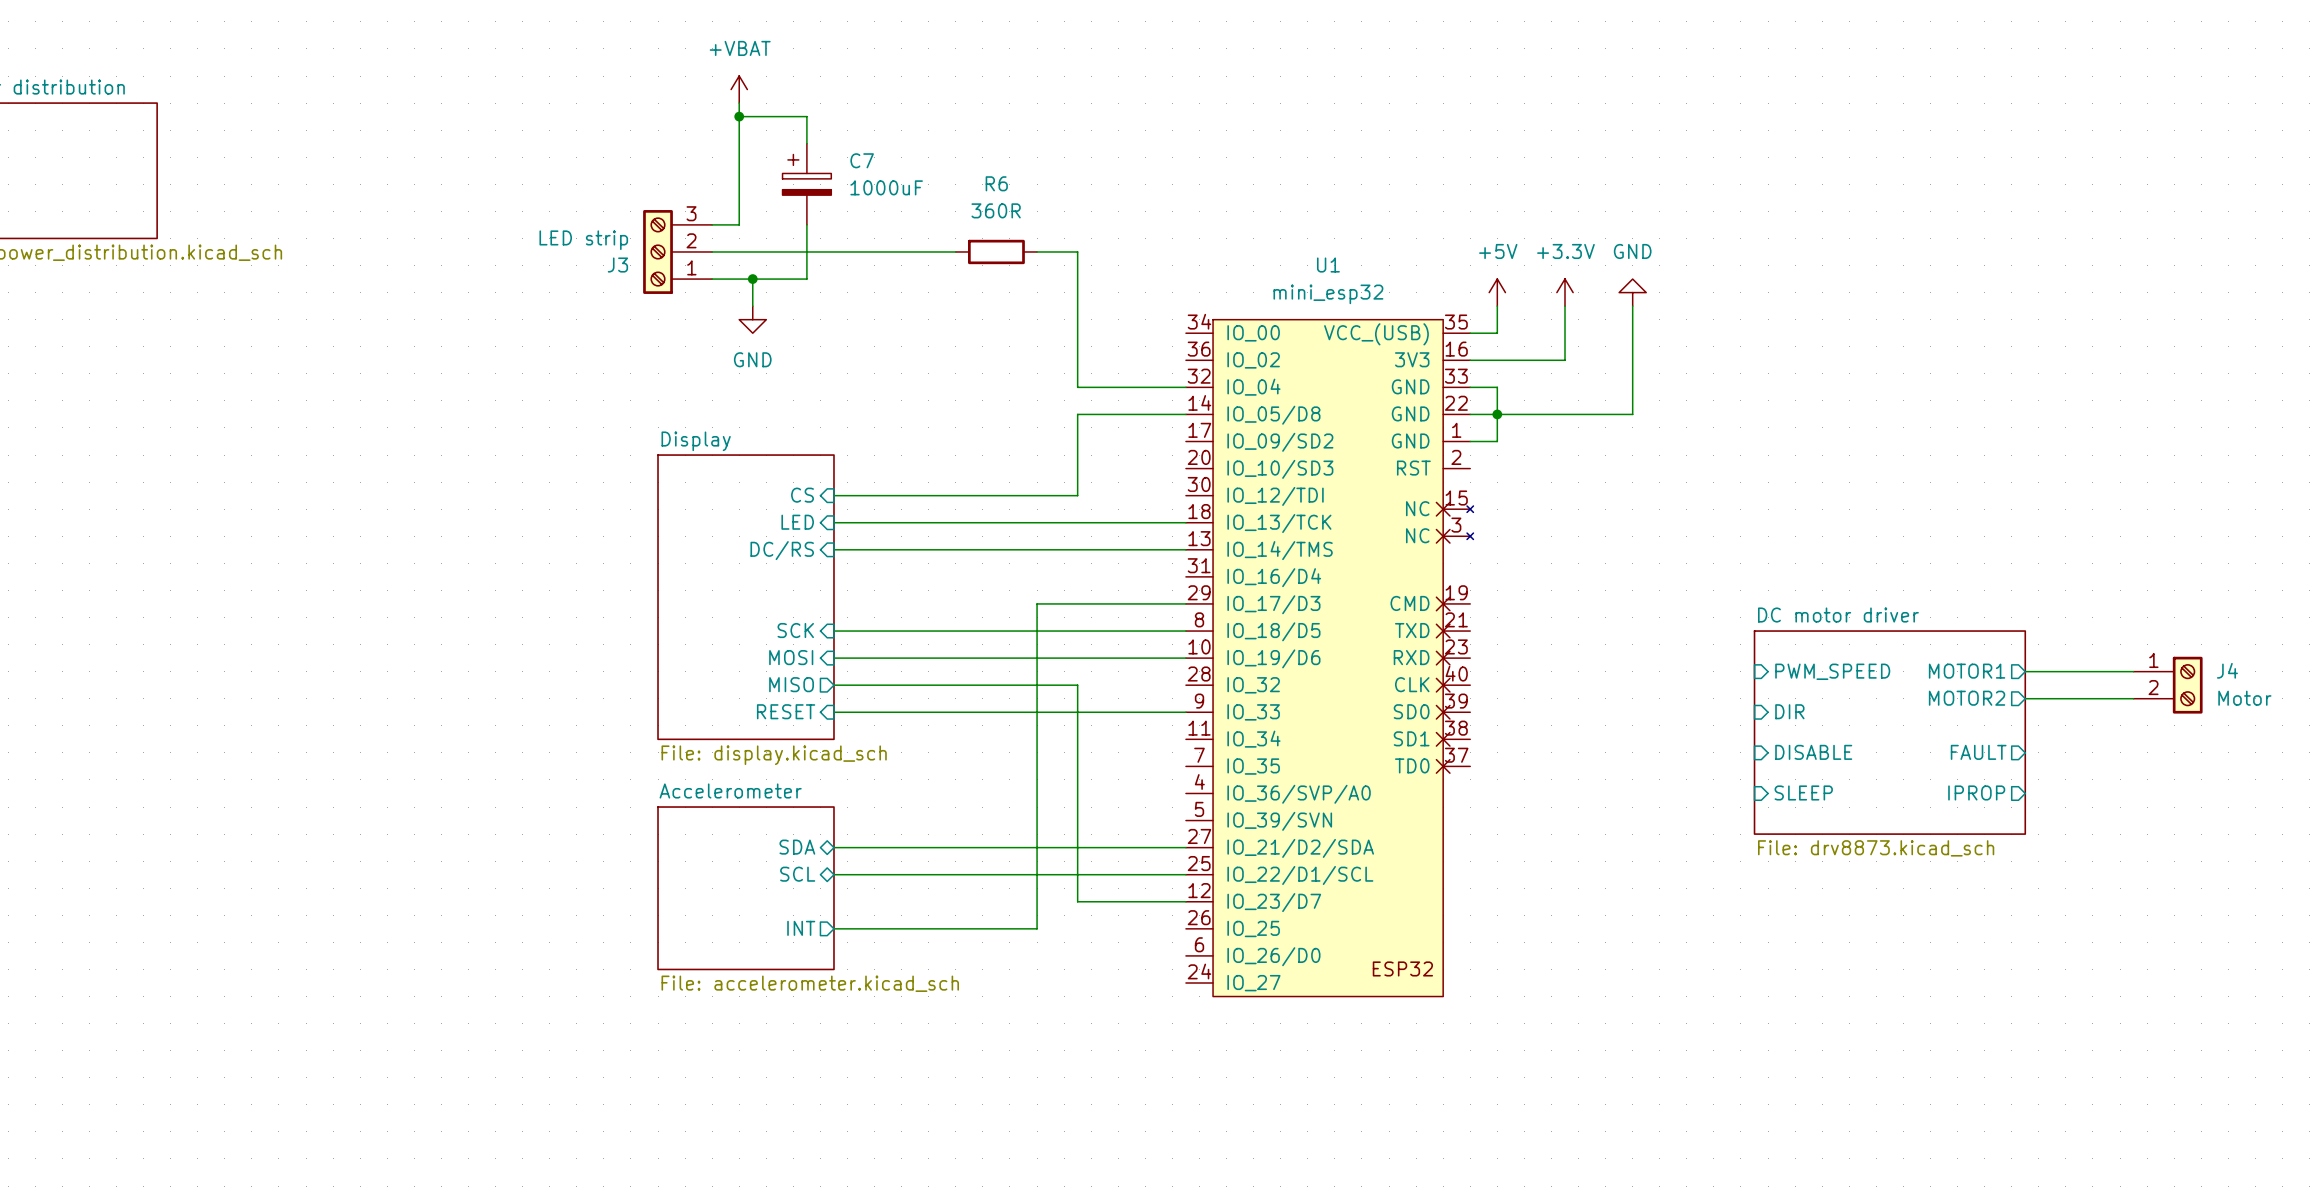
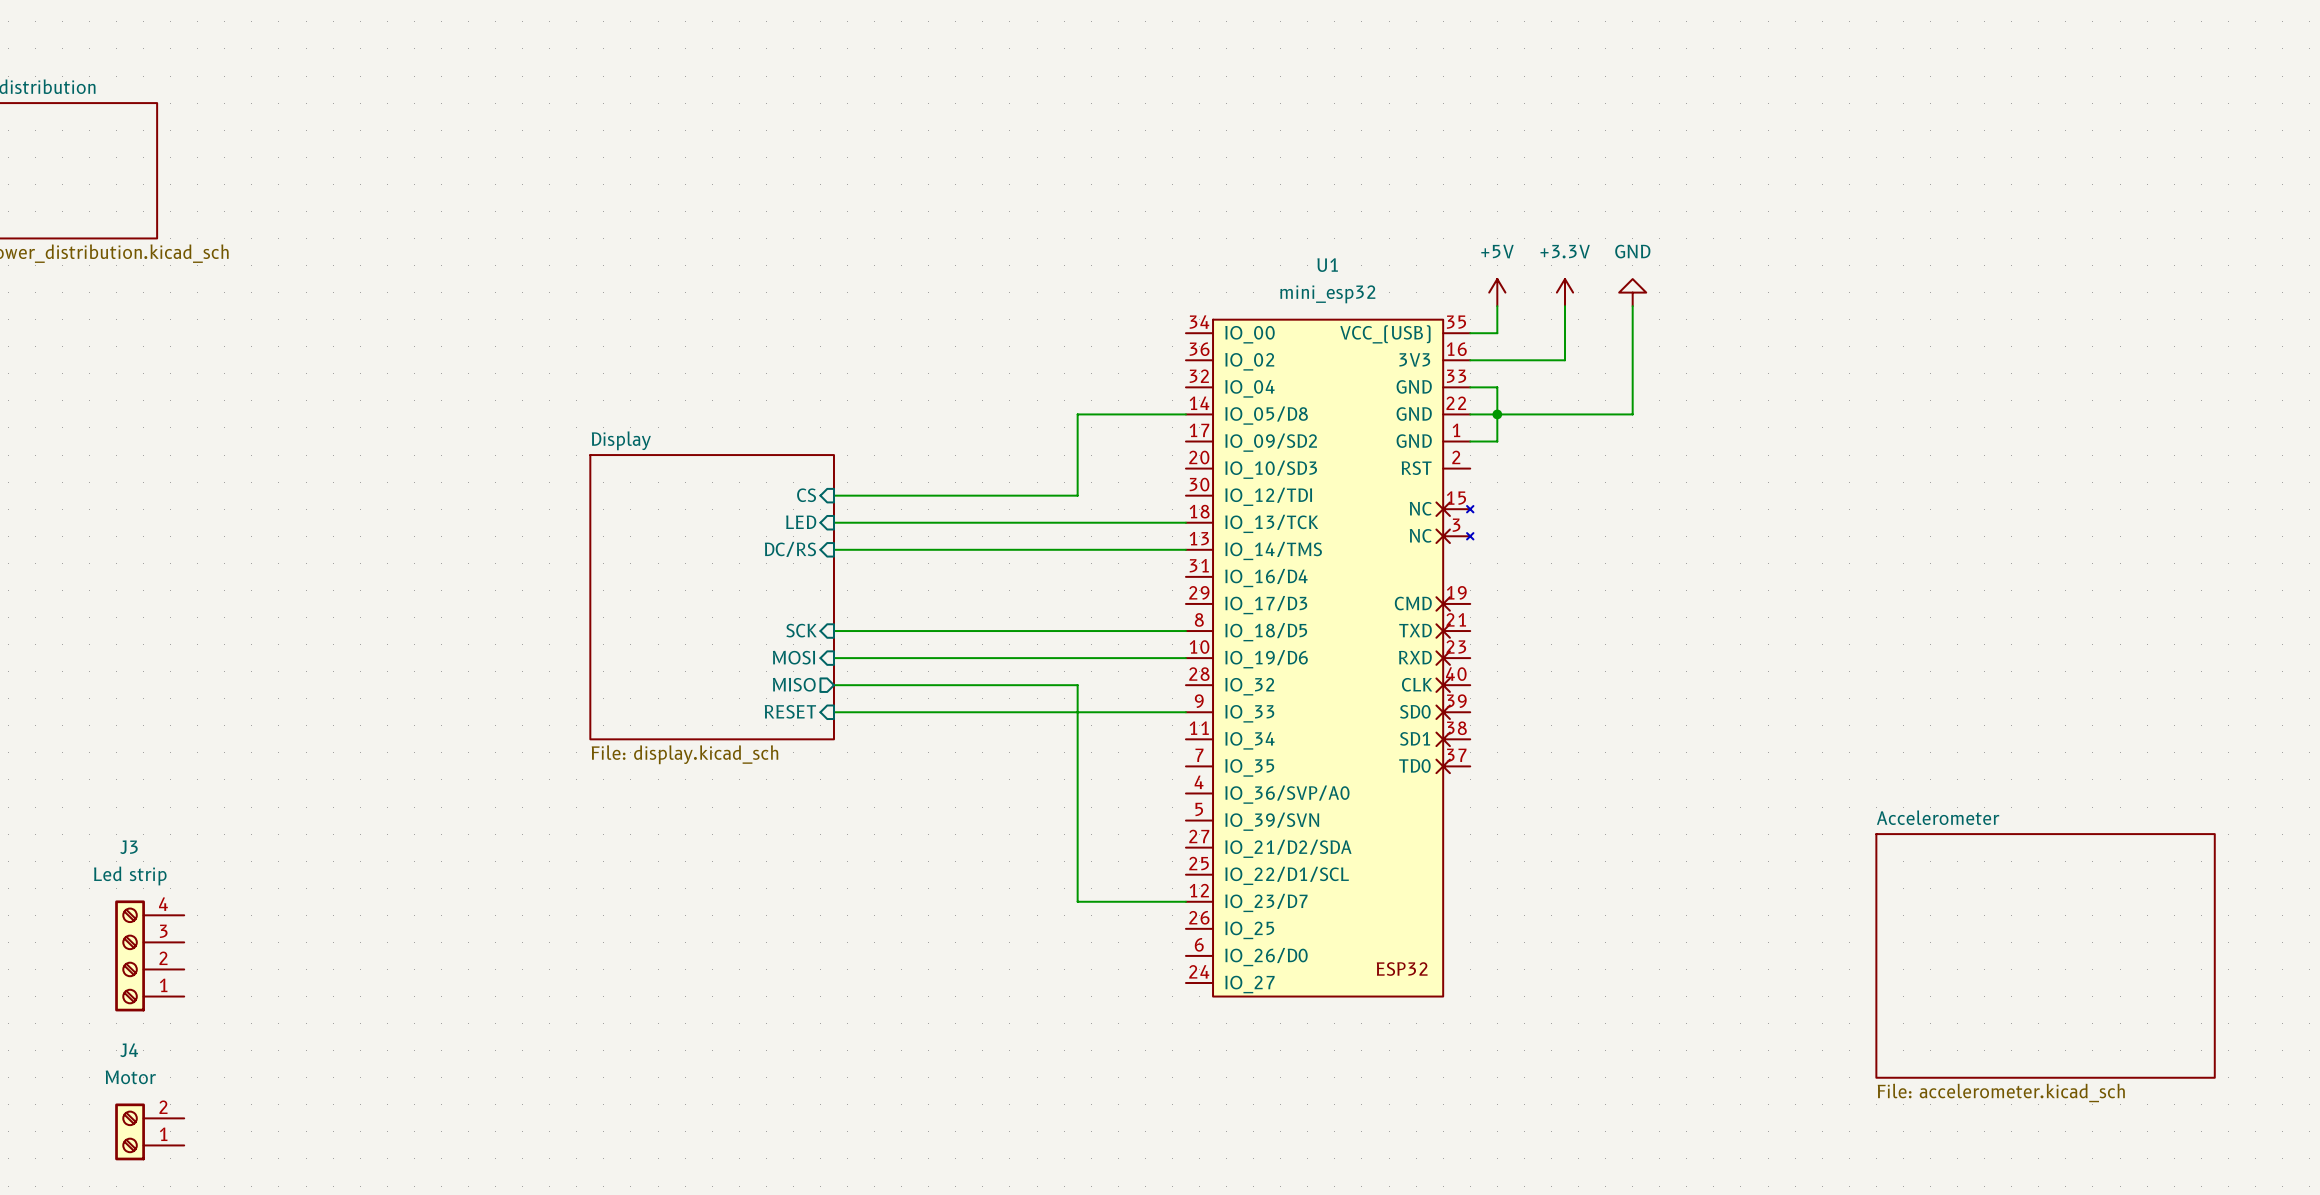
power symbol: +VBAT (739, 89) -> none
wire: (739, 103) (739, 224) (712, 224) -> none
wire: (739, 116) (806, 116) (806, 143) -> none
junction: (739, 116) -> none
C7: 1000uF (806, 184) -> none
J3 symbol: [643, 210, 713, 294] -> [115, 900, 185, 1012]
wire: (806, 224) (806, 279) (712, 279) -> none
J3 value: LED strip (583, 240) -> Led strip (130, 875)
wire: (712, 251) (955, 251) -> none
R6: 360R (996, 251) -> none
wire: (1037, 251) (1077, 251) (1077, 387) (1185, 387) -> none
J3 name position: J3 (617, 265) -> J3 (128, 847)
wire: (752, 279) (752, 306) -> none
junction: (752, 279) -> none
power symbol: GND (752, 319) -> none
sheet Display: none -> File: display.kicad_sch (712, 597)
sheet Display: File: display.kicad_sch (745, 597) -> none
wire: (1185, 603) (1037, 603) (1037, 928) (833, 928) -> none
J4 name position: J4 (2227, 670) -> J4 (129, 1050)
sheet pin: PWM_SPEED (1832, 671) -> none
sheet pin: MOTOR1 (1967, 671) -> none
wire: (2025, 671) (2133, 671) -> none
J4 position: (2168, 685) -> (149, 1131)
J4 rotation: 0° (2187, 685) -> 180° (130, 1131)
sheet pin: MOTOR2 (1967, 698) -> none
wire: (2025, 698) (2133, 698) -> none
J4 value position: Motor (2244, 698) -> Motor (130, 1077)
sheet pin: DIR (1789, 711) -> none
sheet DC motor driver: File: drv8873.kicad_sch (1889, 732) -> none
sheet pin: DISABLE (1813, 752) -> none
sheet pin: FAULT (1978, 752) -> none
sheet pin: SLEEP (1803, 792) -> none
sheet pin: IPROP (1976, 792) -> none
sheet pin: SDA (797, 847) -> none
wire: (833, 847) (1185, 847) -> none
sheet pin: SCL (797, 874) -> none
wire: (833, 874) (1185, 874) -> none
sheet Accelerometer: File: accelerometer.kicad_sch (745, 888) -> none
sheet pin: INT (801, 928) -> none
sheet Accelerometer: none -> File: accelerometer.kicad_sch (2045, 955)

